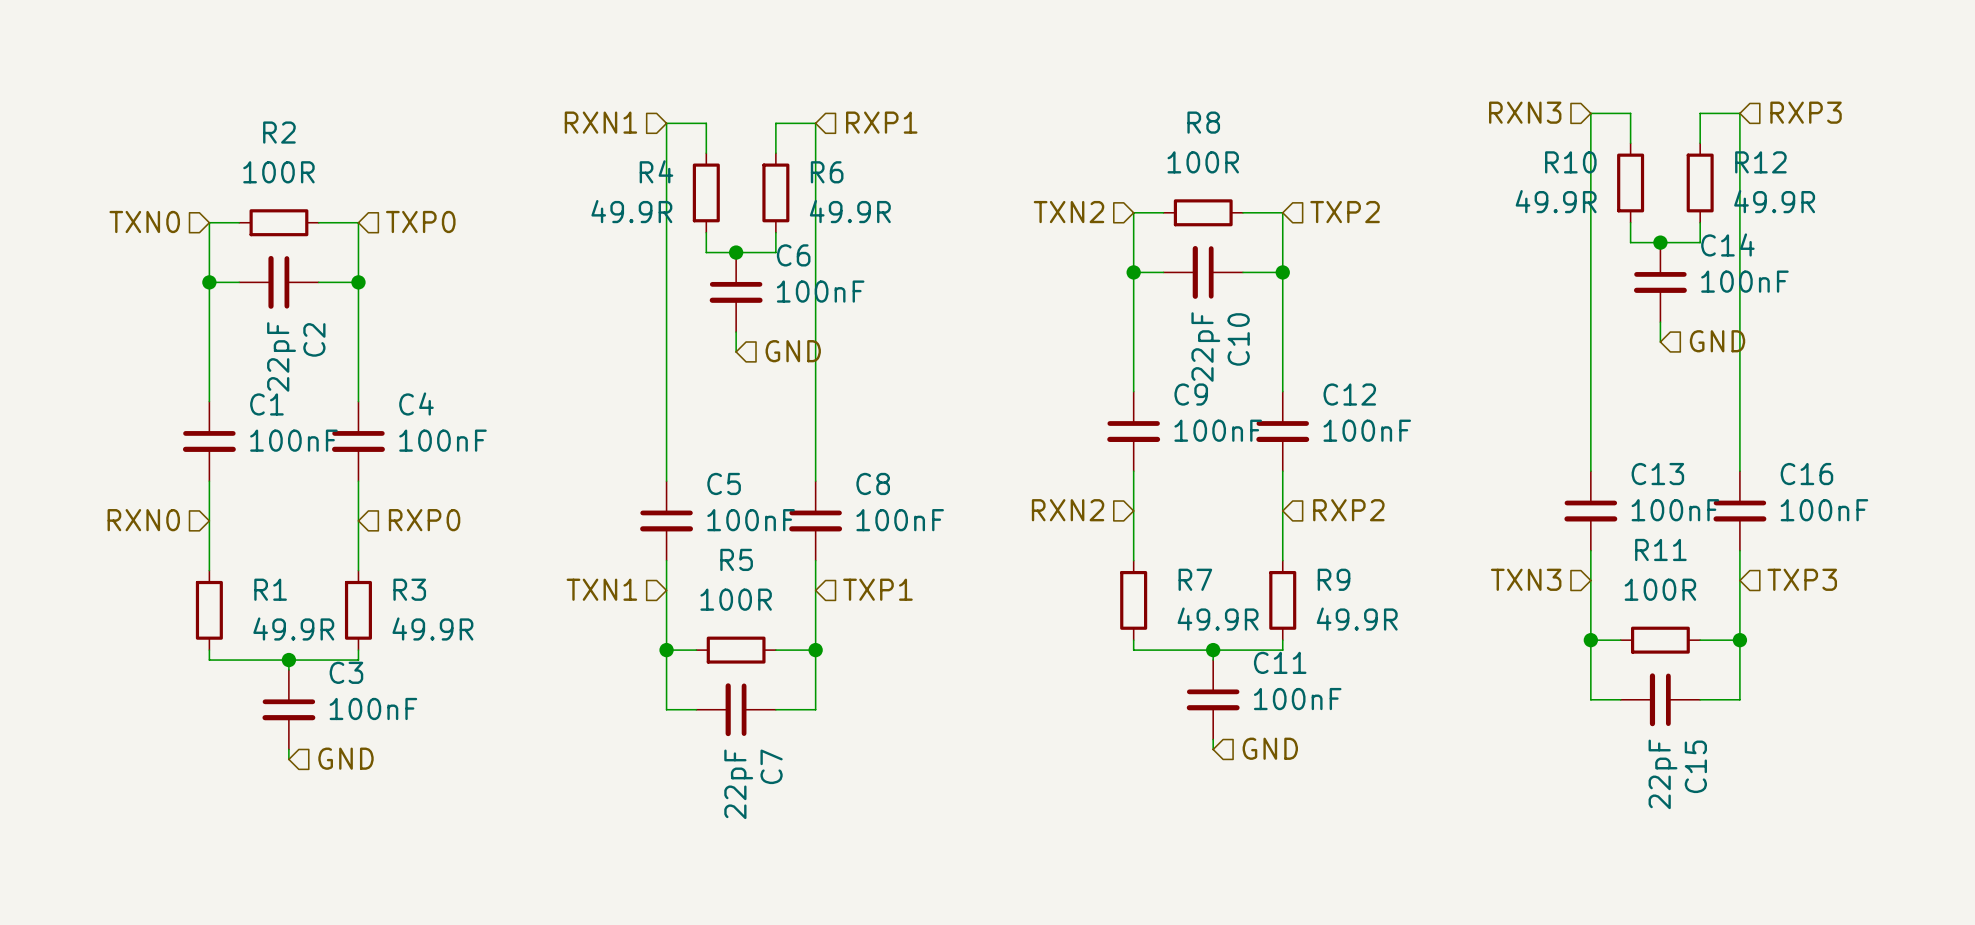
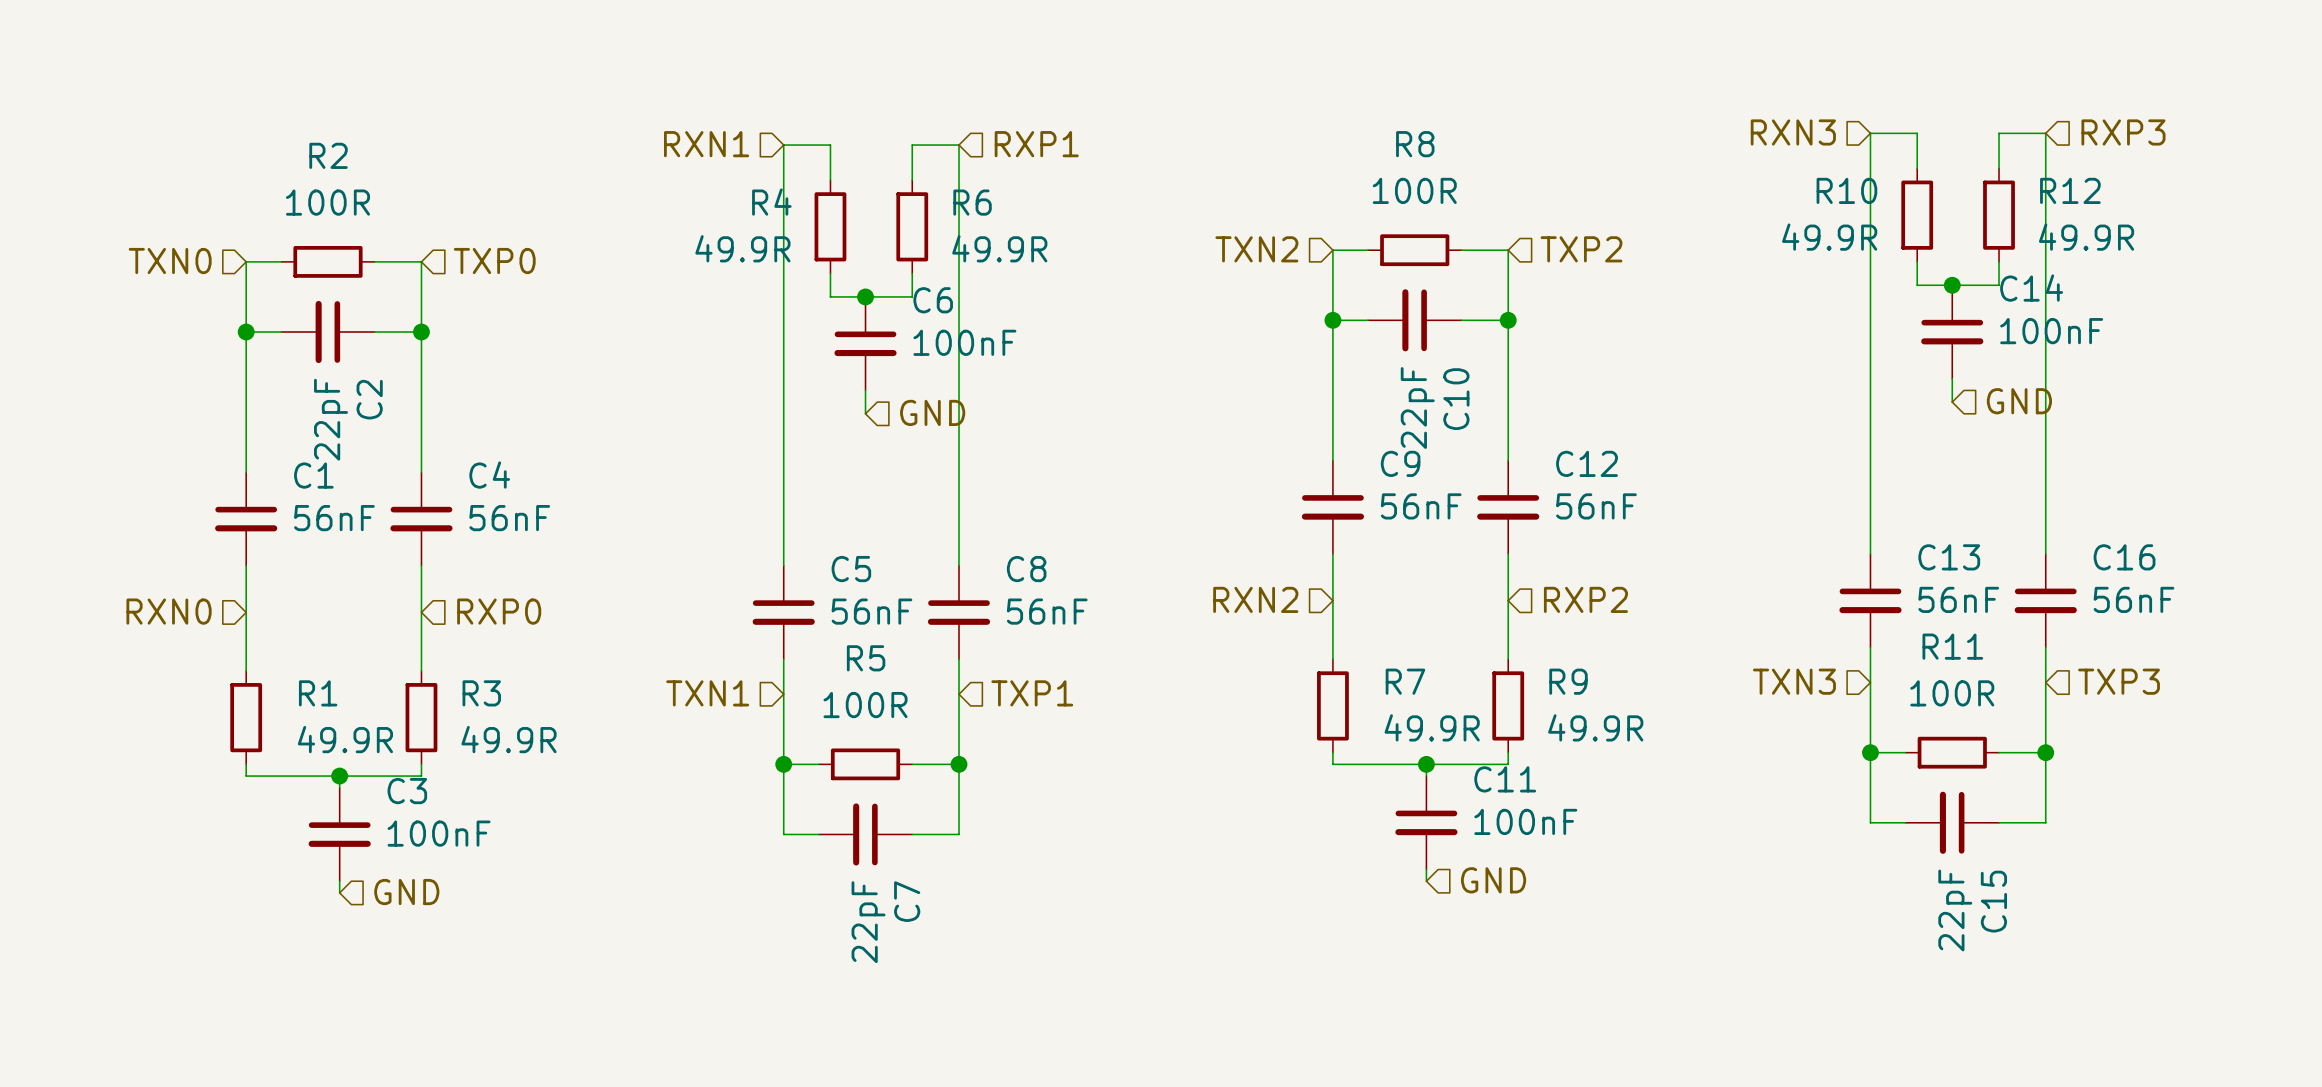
C9 value: 100nF (1218, 430) -> 56nF (1421, 506)
C12 value: 100nF (1367, 430) -> 56nF (1596, 506)
C1 value: 100nF (293, 440) -> 56nF (334, 518)
C4 value: 100nF (442, 440) -> 56nF (509, 518)
C13 value: 100nF (1675, 510) -> 56nF (1958, 599)
C16 value: 100nF (1824, 510) -> 56nF (2134, 599)
C5 value: 100nF (751, 520) -> 56nF (871, 611)
C8 value: 100nF (900, 520) -> 56nF (1047, 611)

